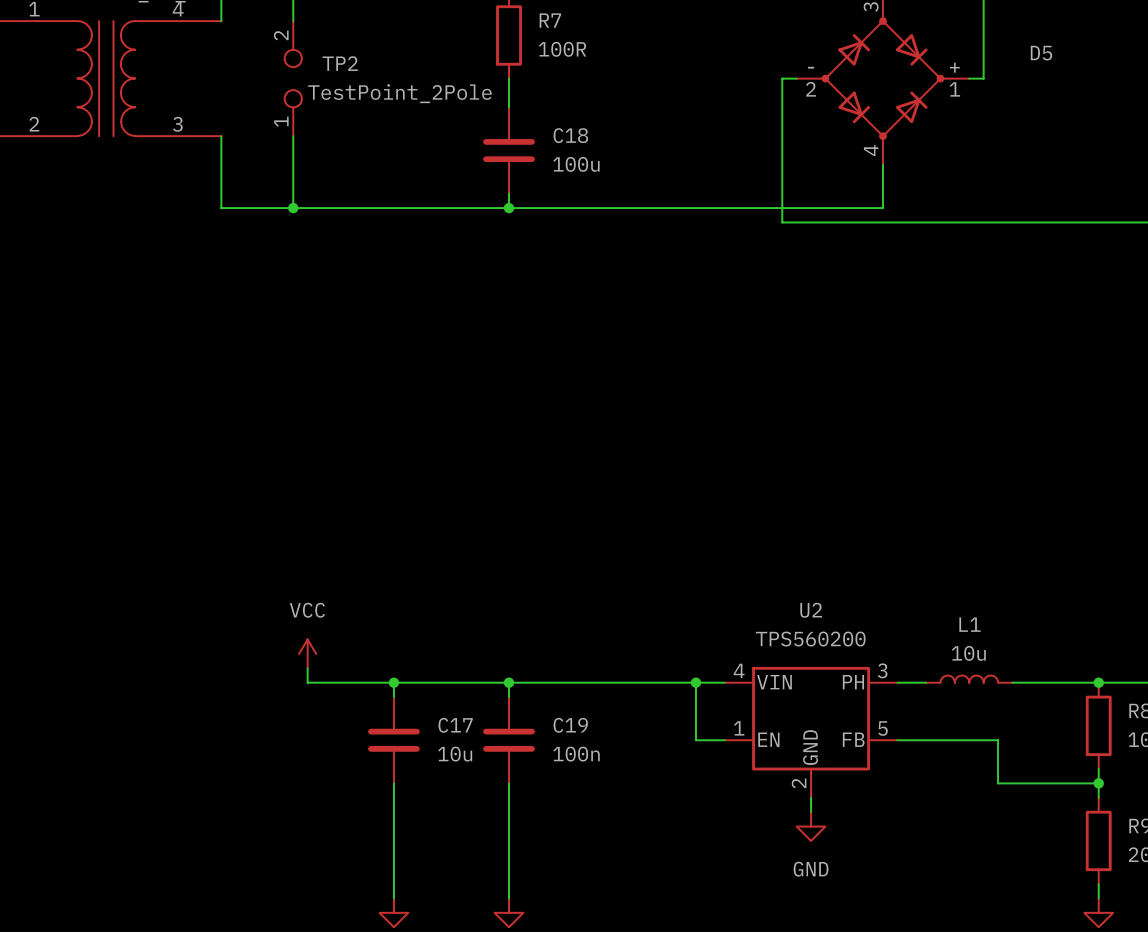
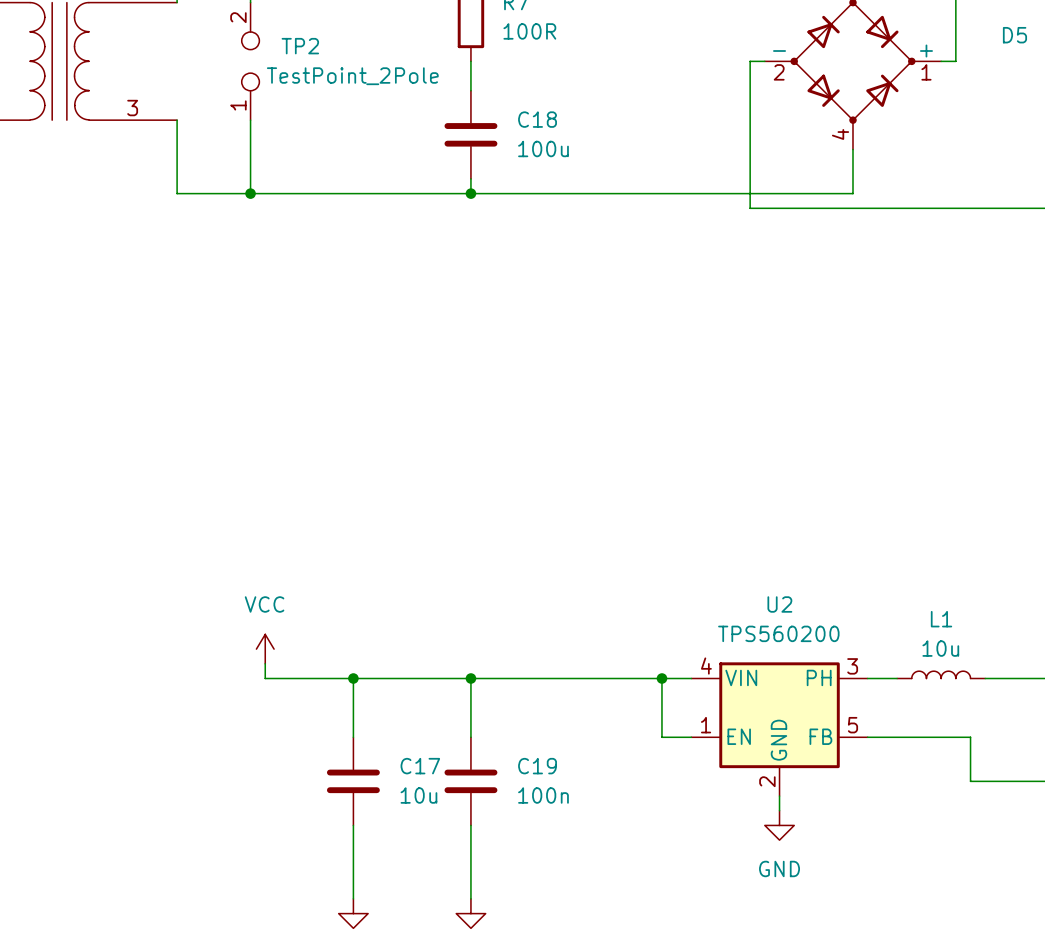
C17 position: (393, 740) -> (353, 781)
C19 position: (509, 740) -> (470, 781)

